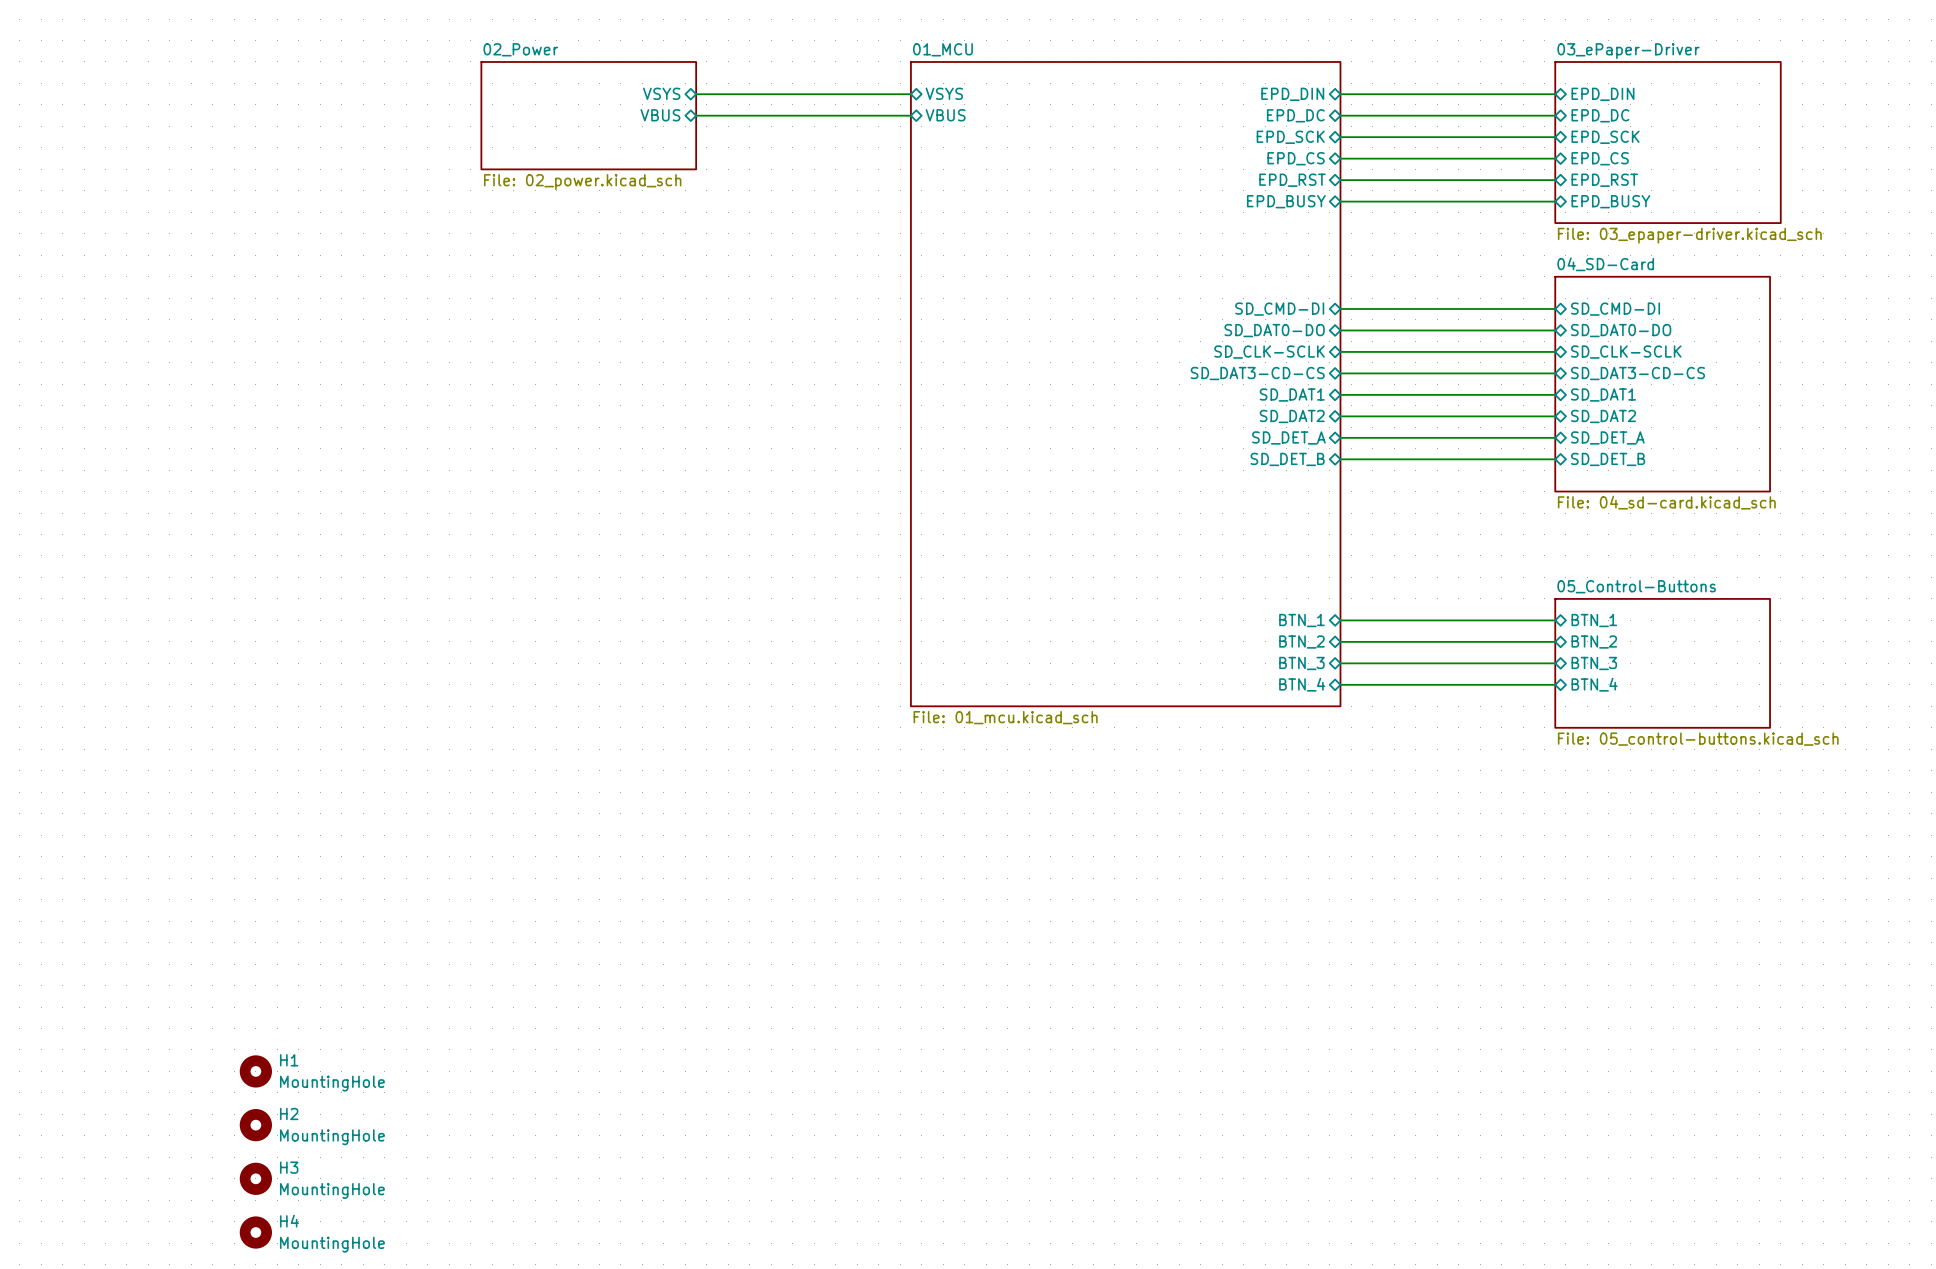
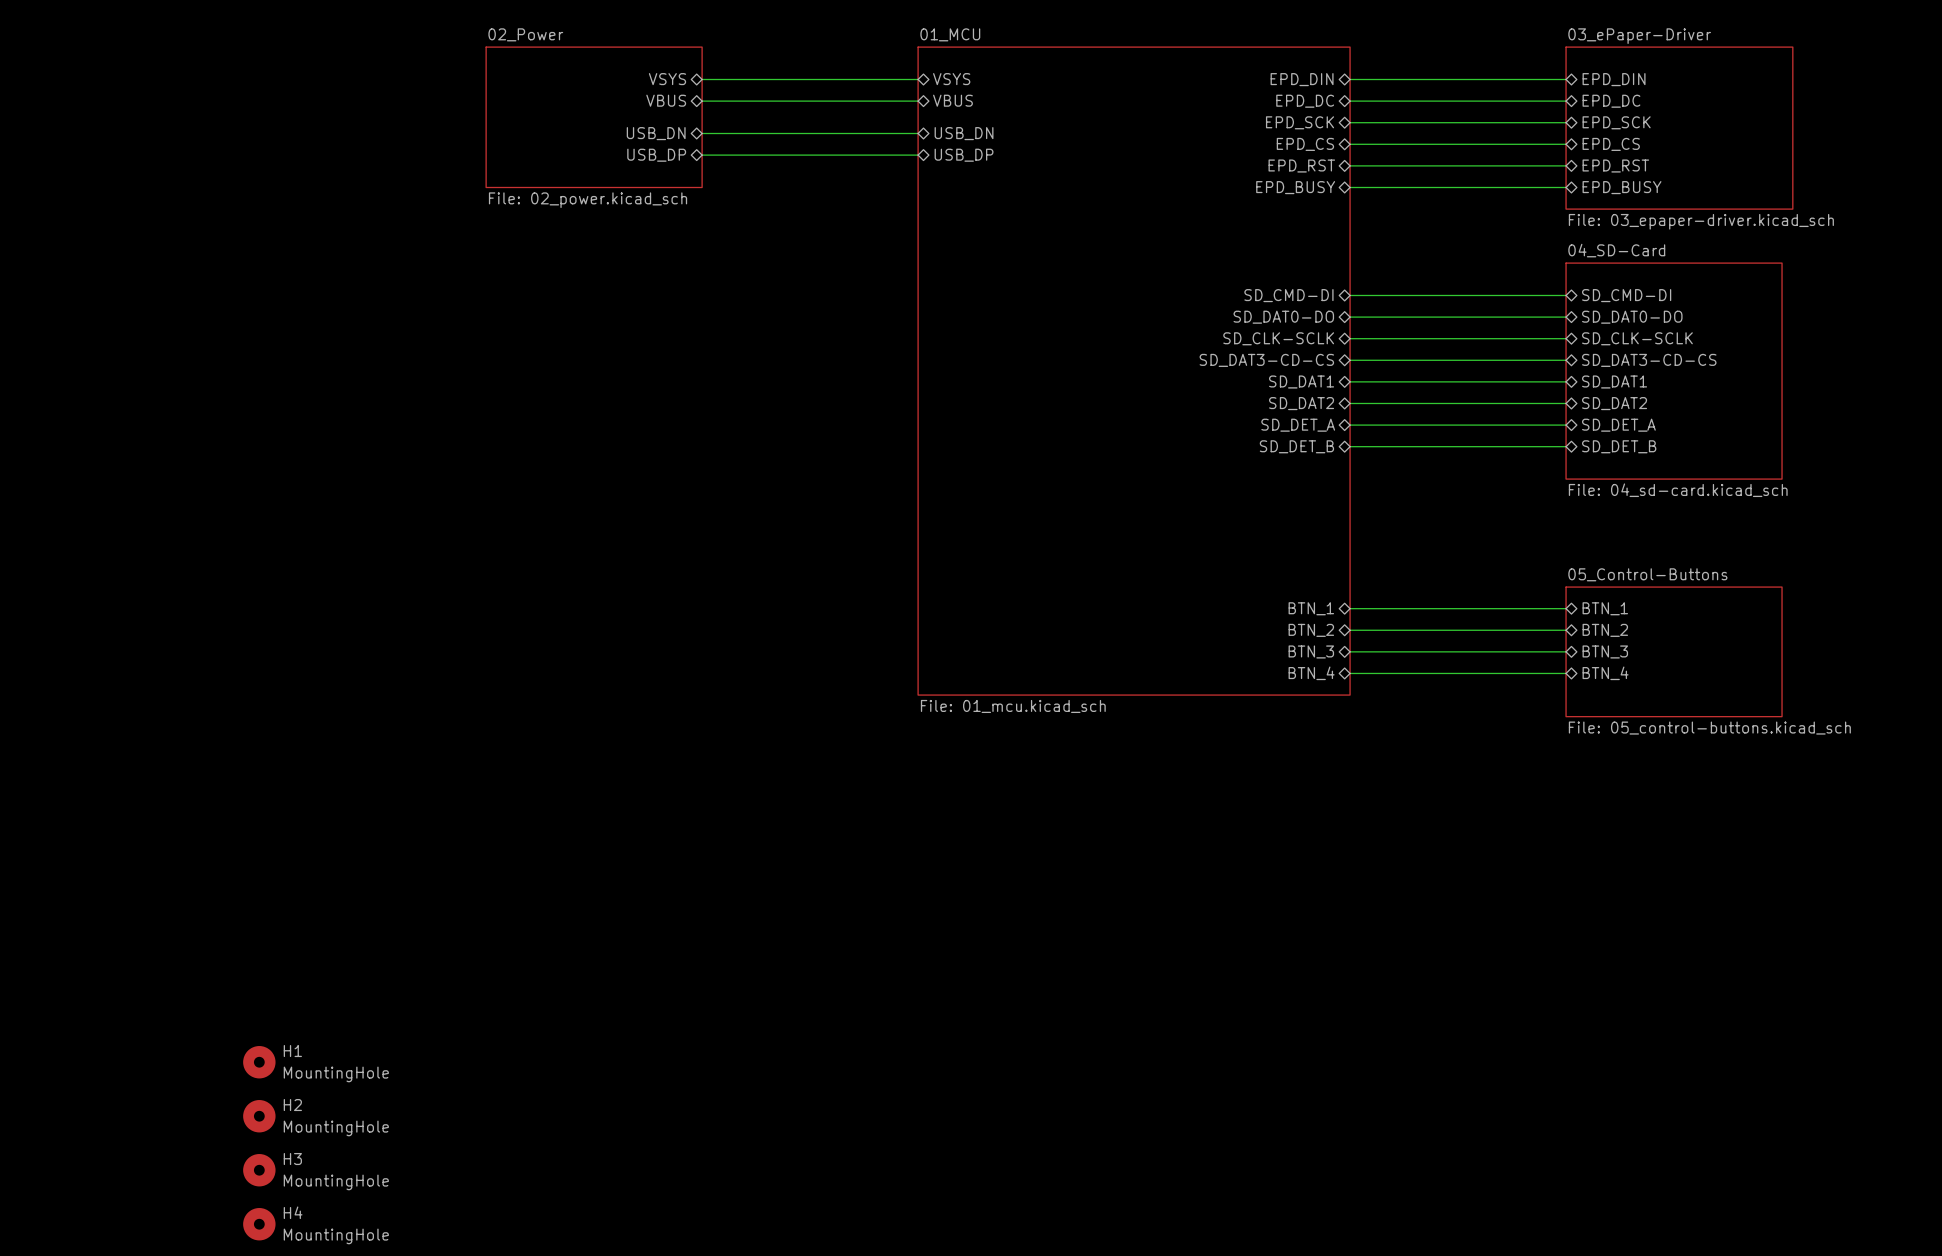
sheet 02_Power shape: [480, 61, 697, 171] -> [485, 46, 703, 189]
wire: none -> (702, 133) (918, 133)
sheet pin: none -> USB_DN (656, 133)
sheet pin: none -> USB_DN (964, 133)
sheet pin: none -> USB_DP (656, 155)
wire: none -> (702, 155) (918, 155)
sheet pin: none -> USB_DP (964, 155)

